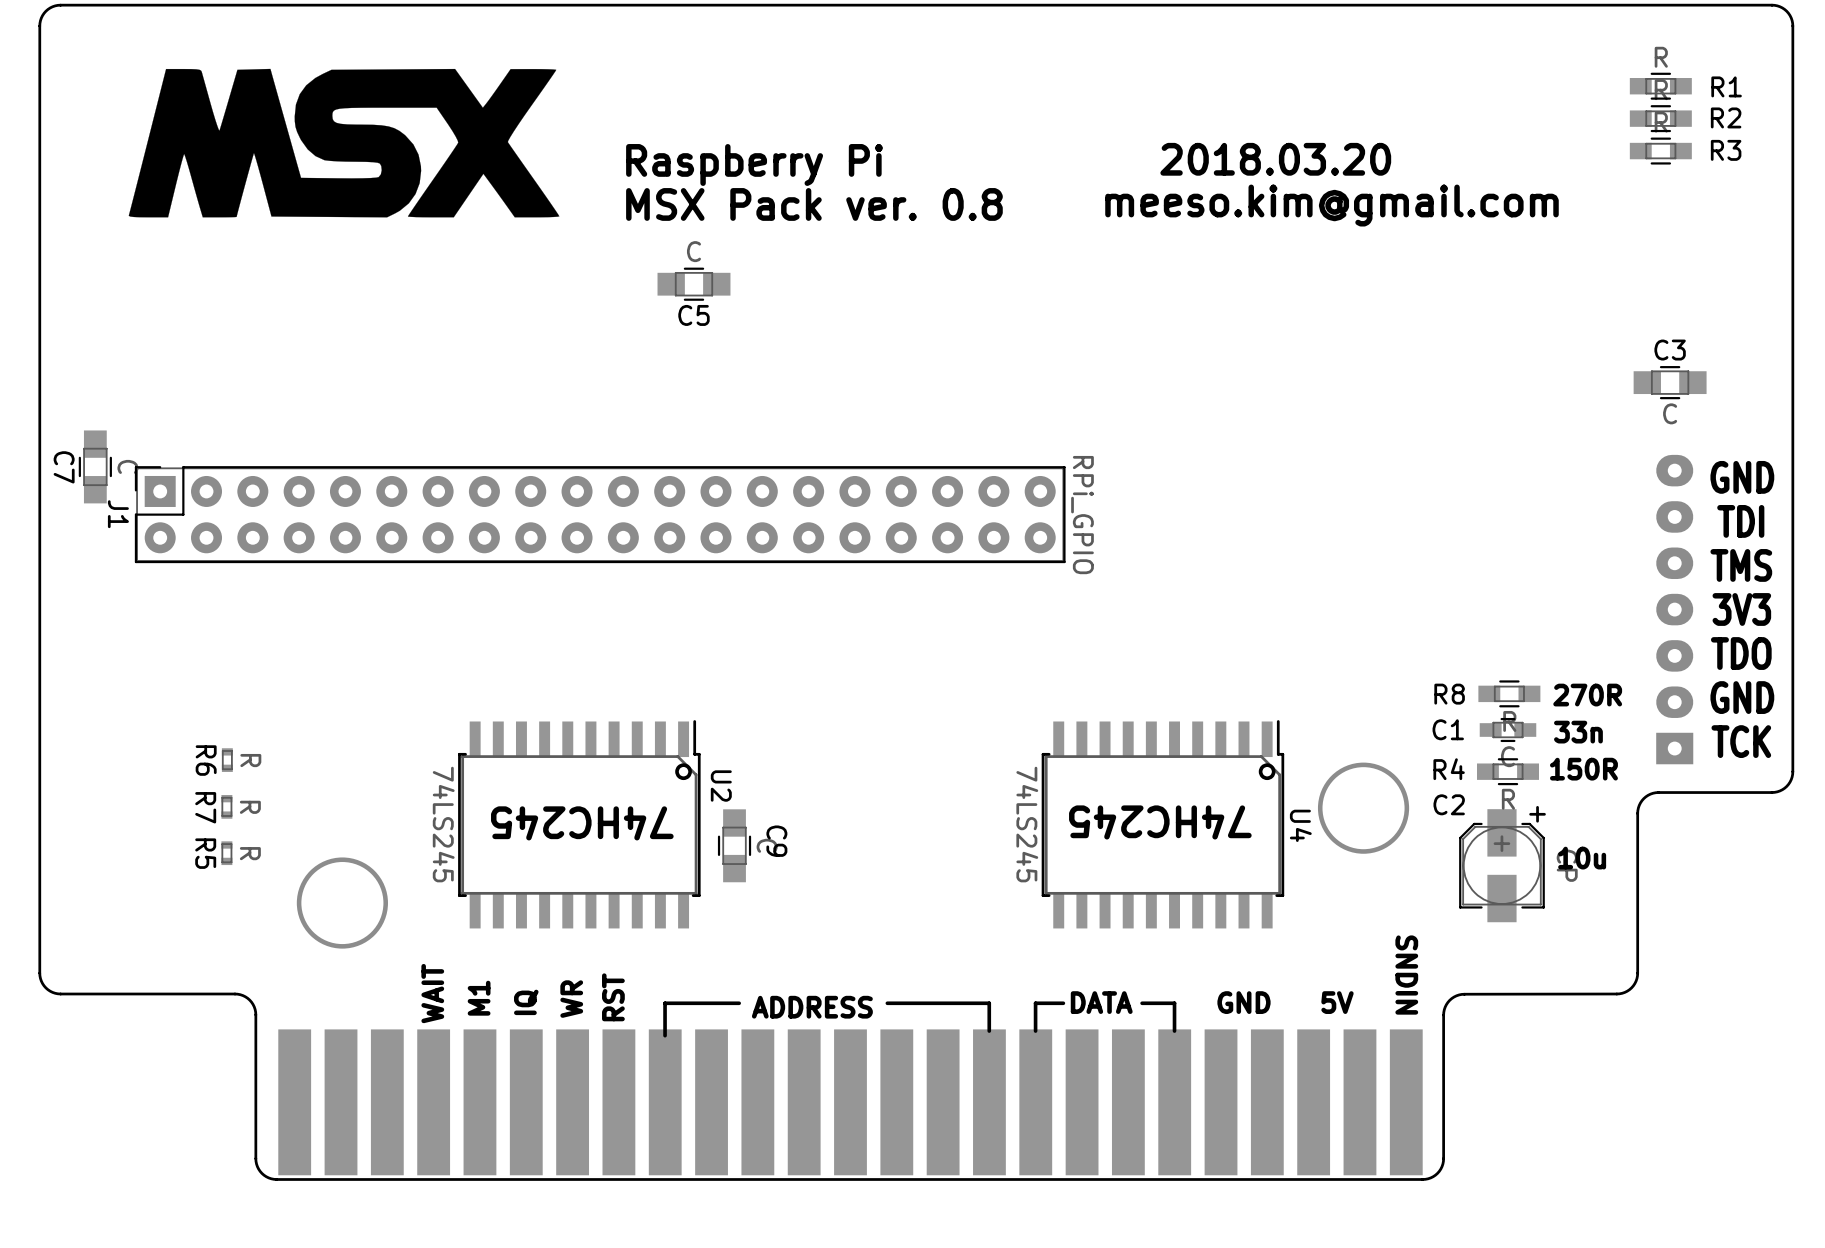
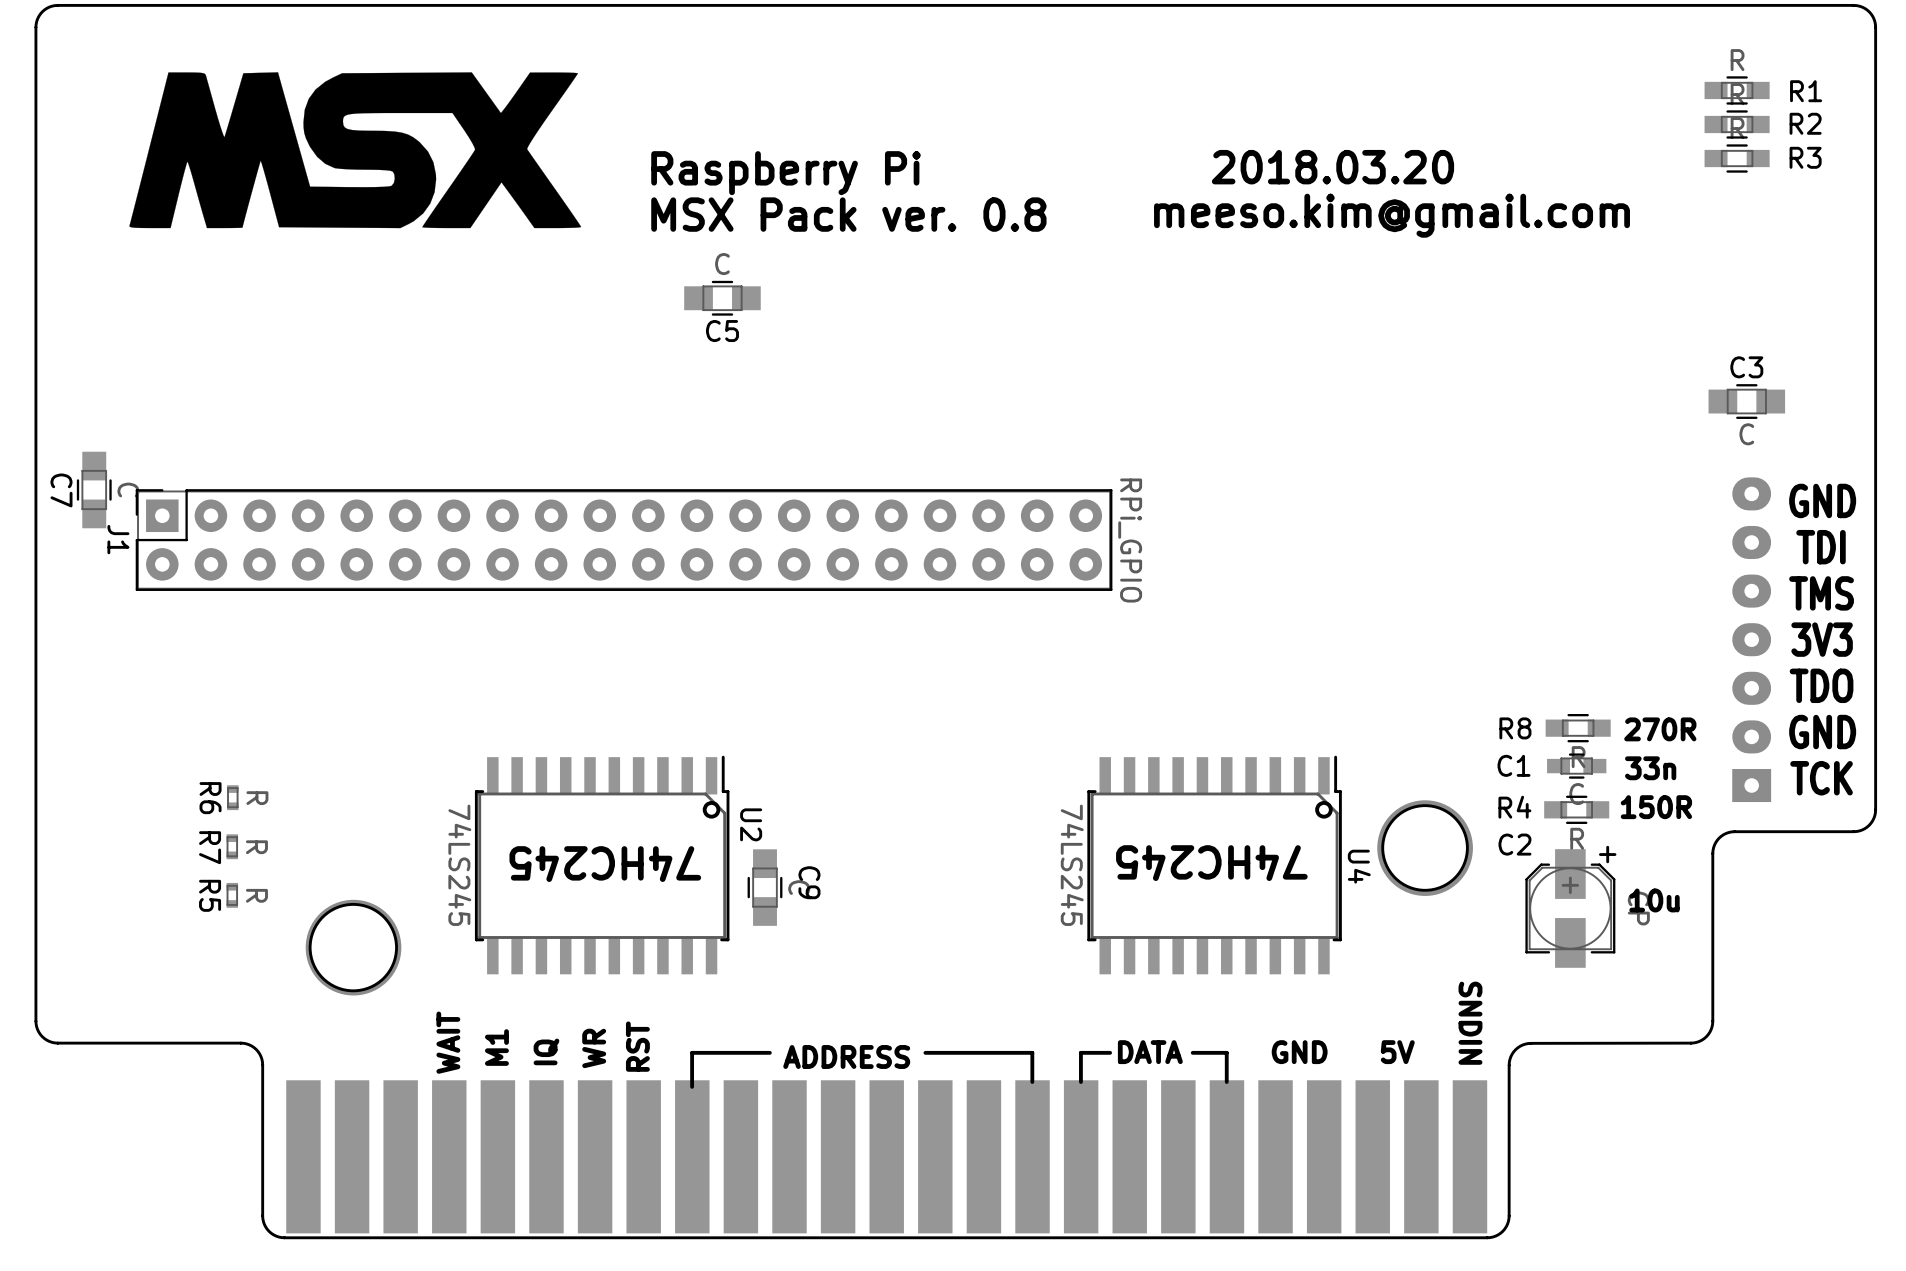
round board edge: none -> [1381, 804, 1469, 892]
round board edge: none -> [308, 902, 398, 993]

